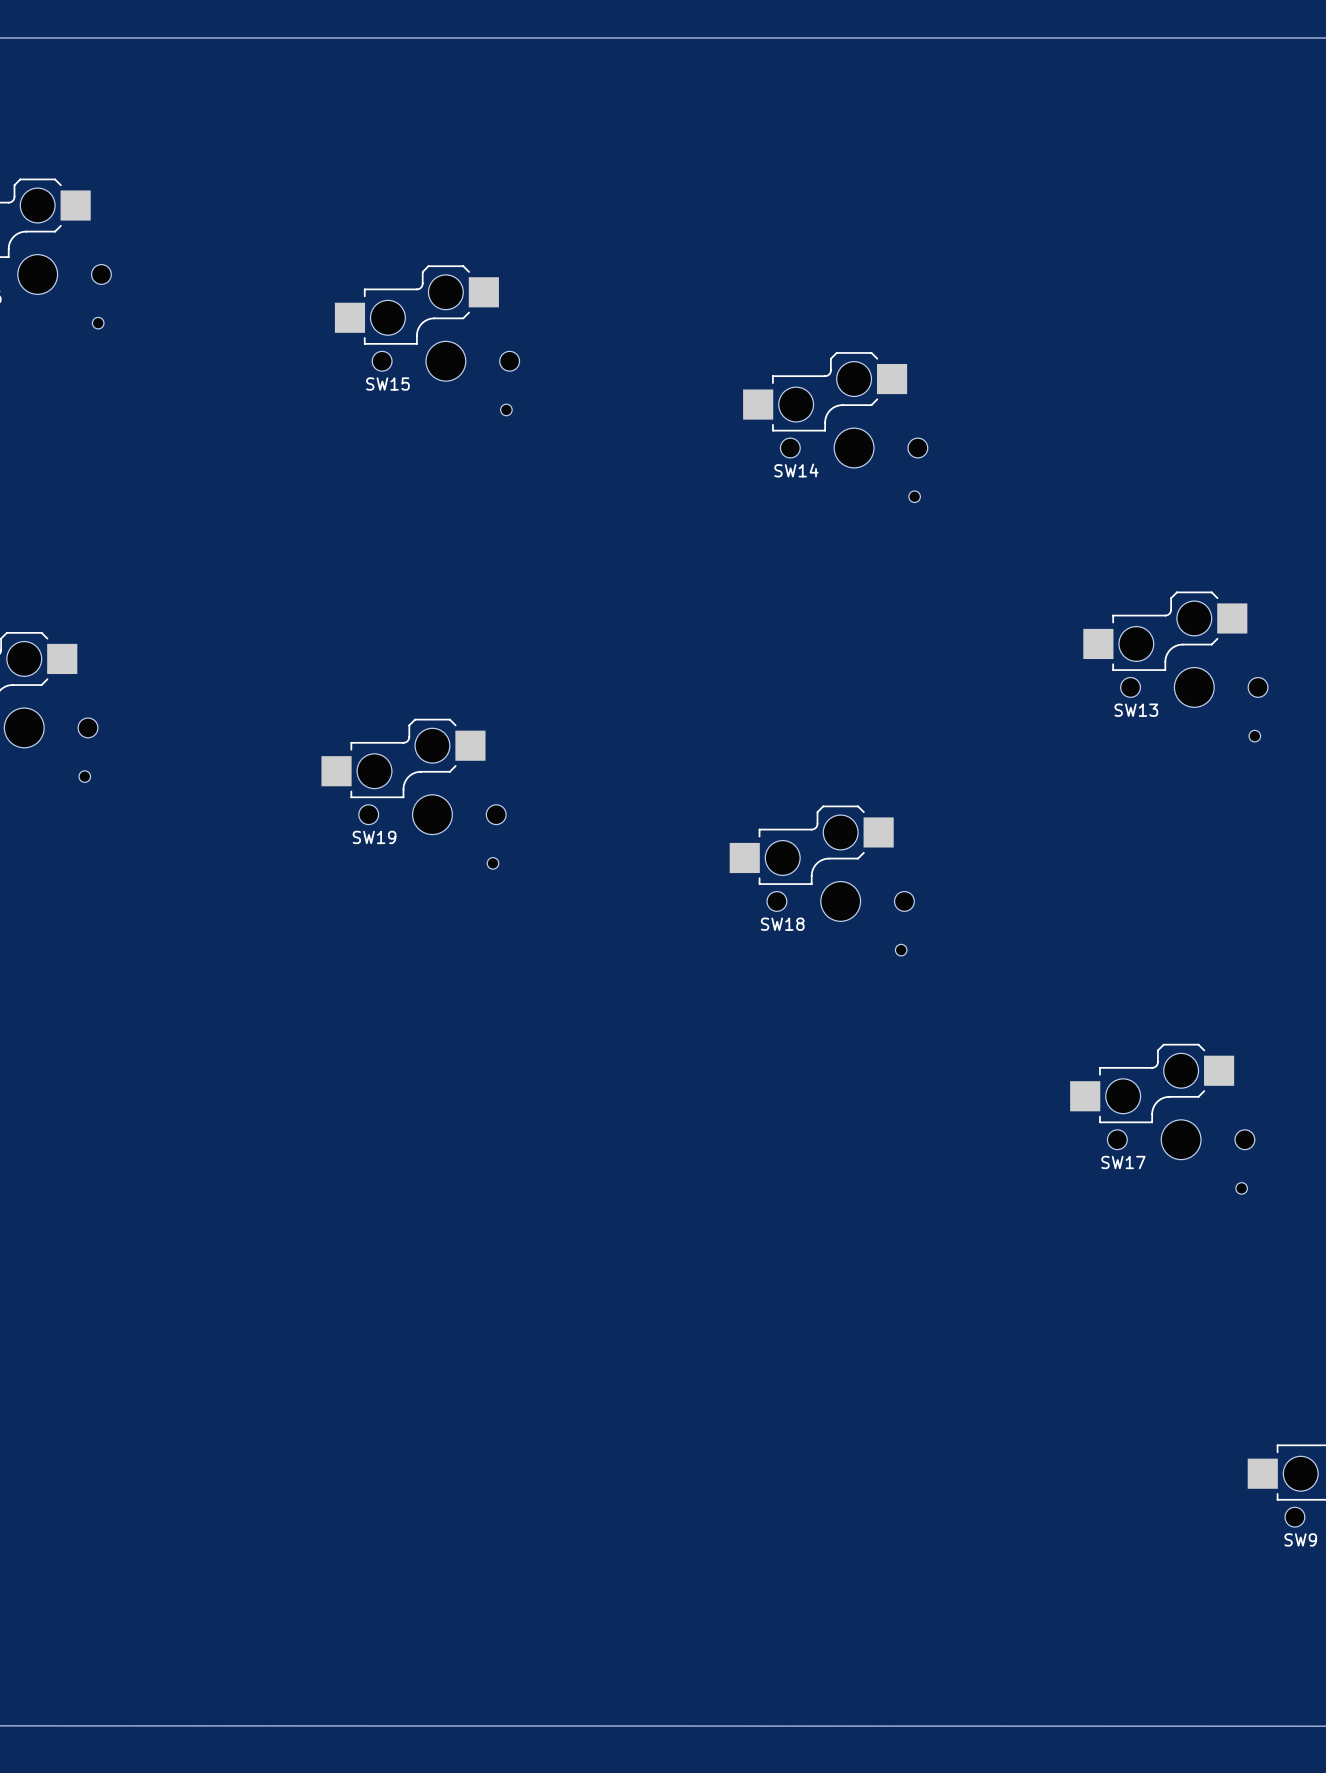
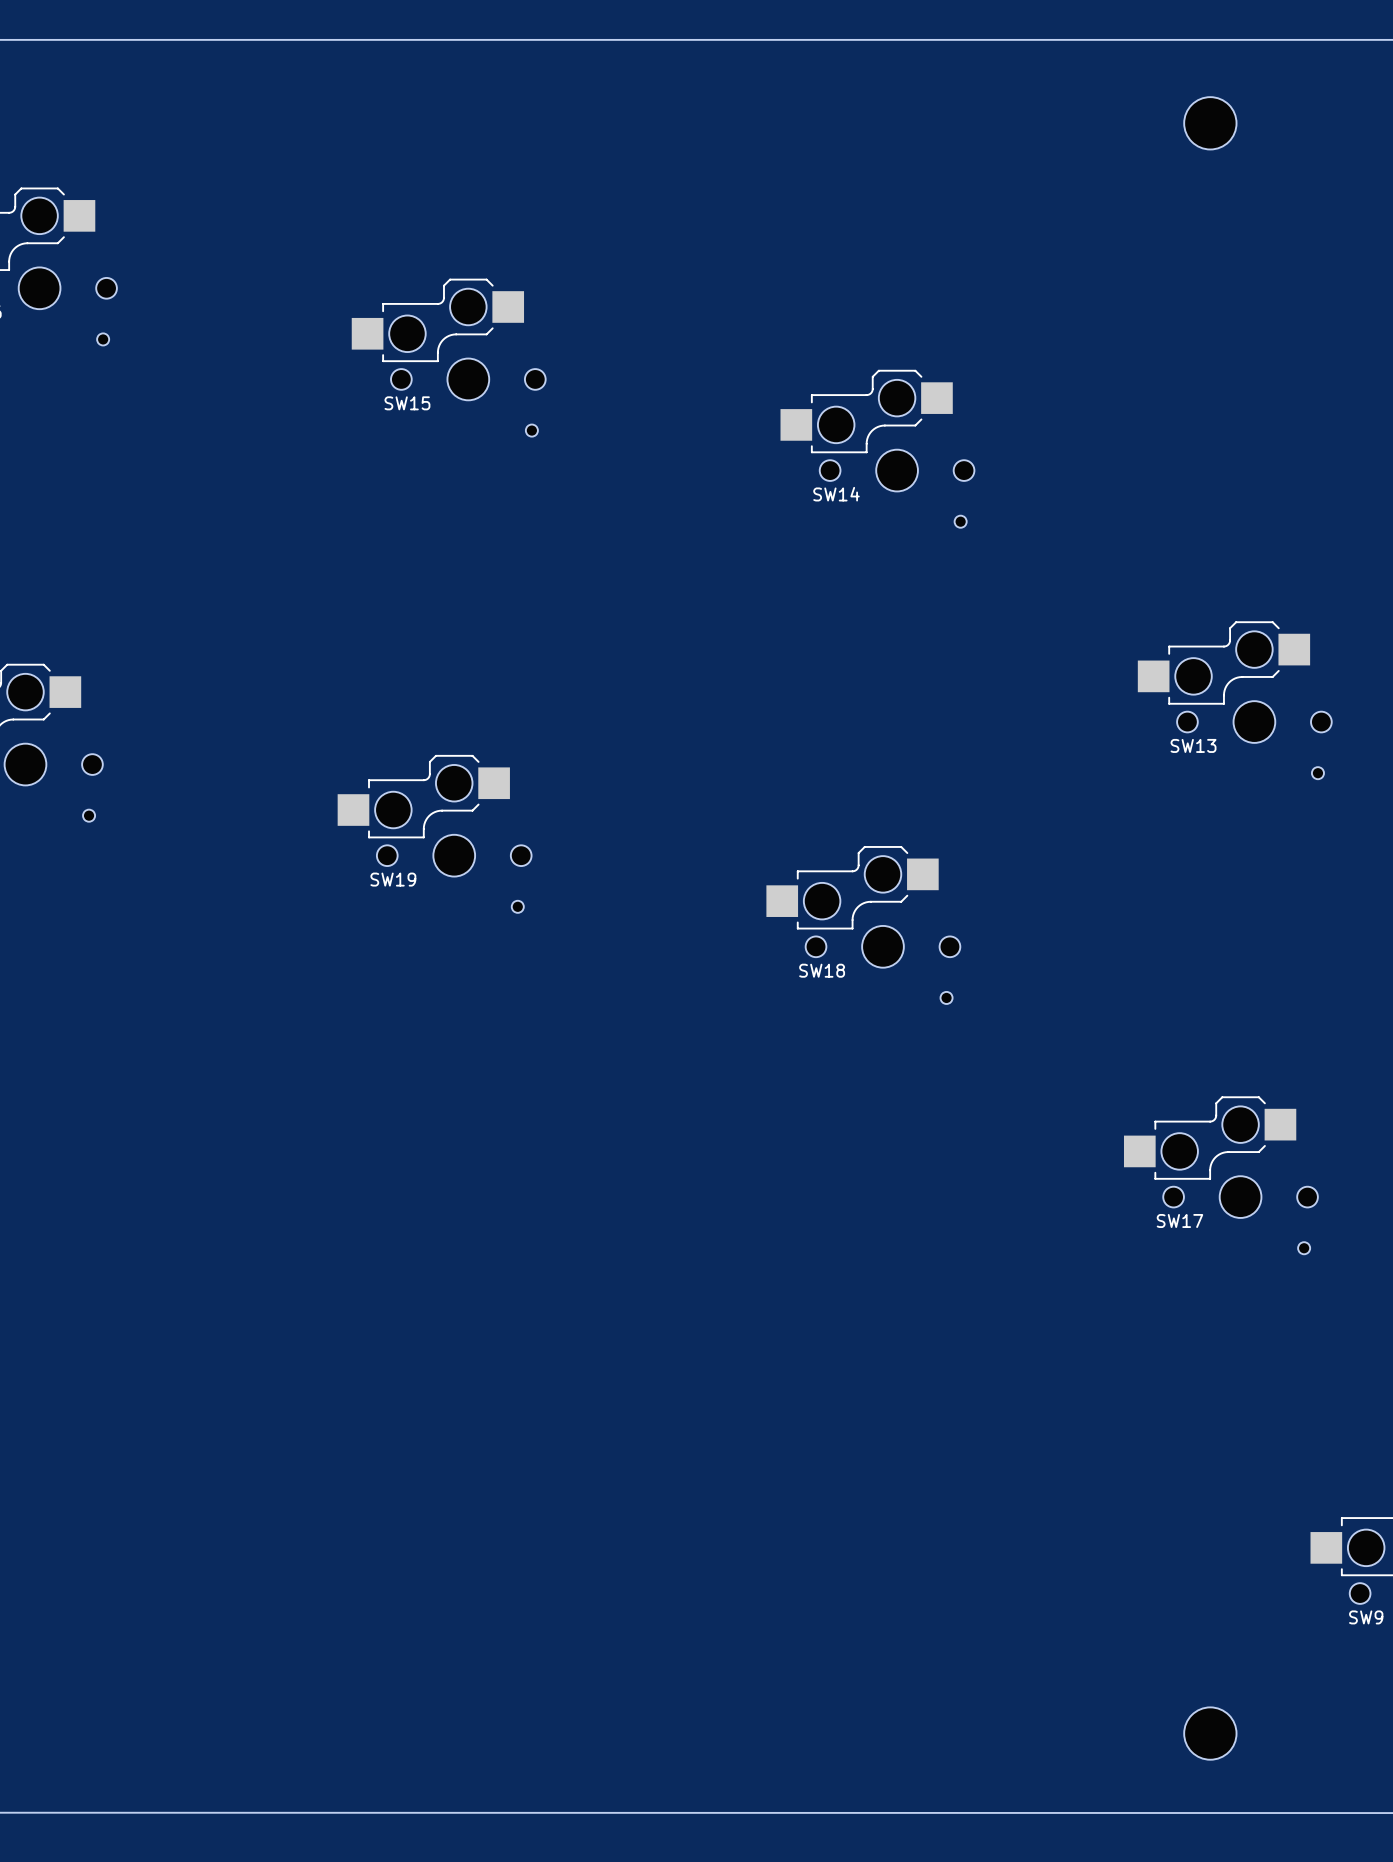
part: none -> (1210, 123)
part: none -> (1210, 1733)

